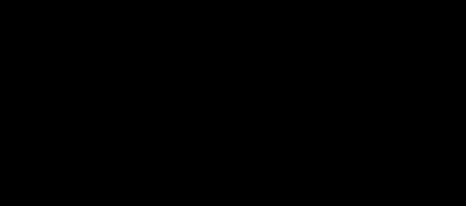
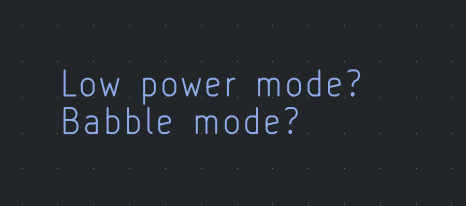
text: none -> Low power mode? (211, 87)
text: none -> Babble mode? (180, 120)

